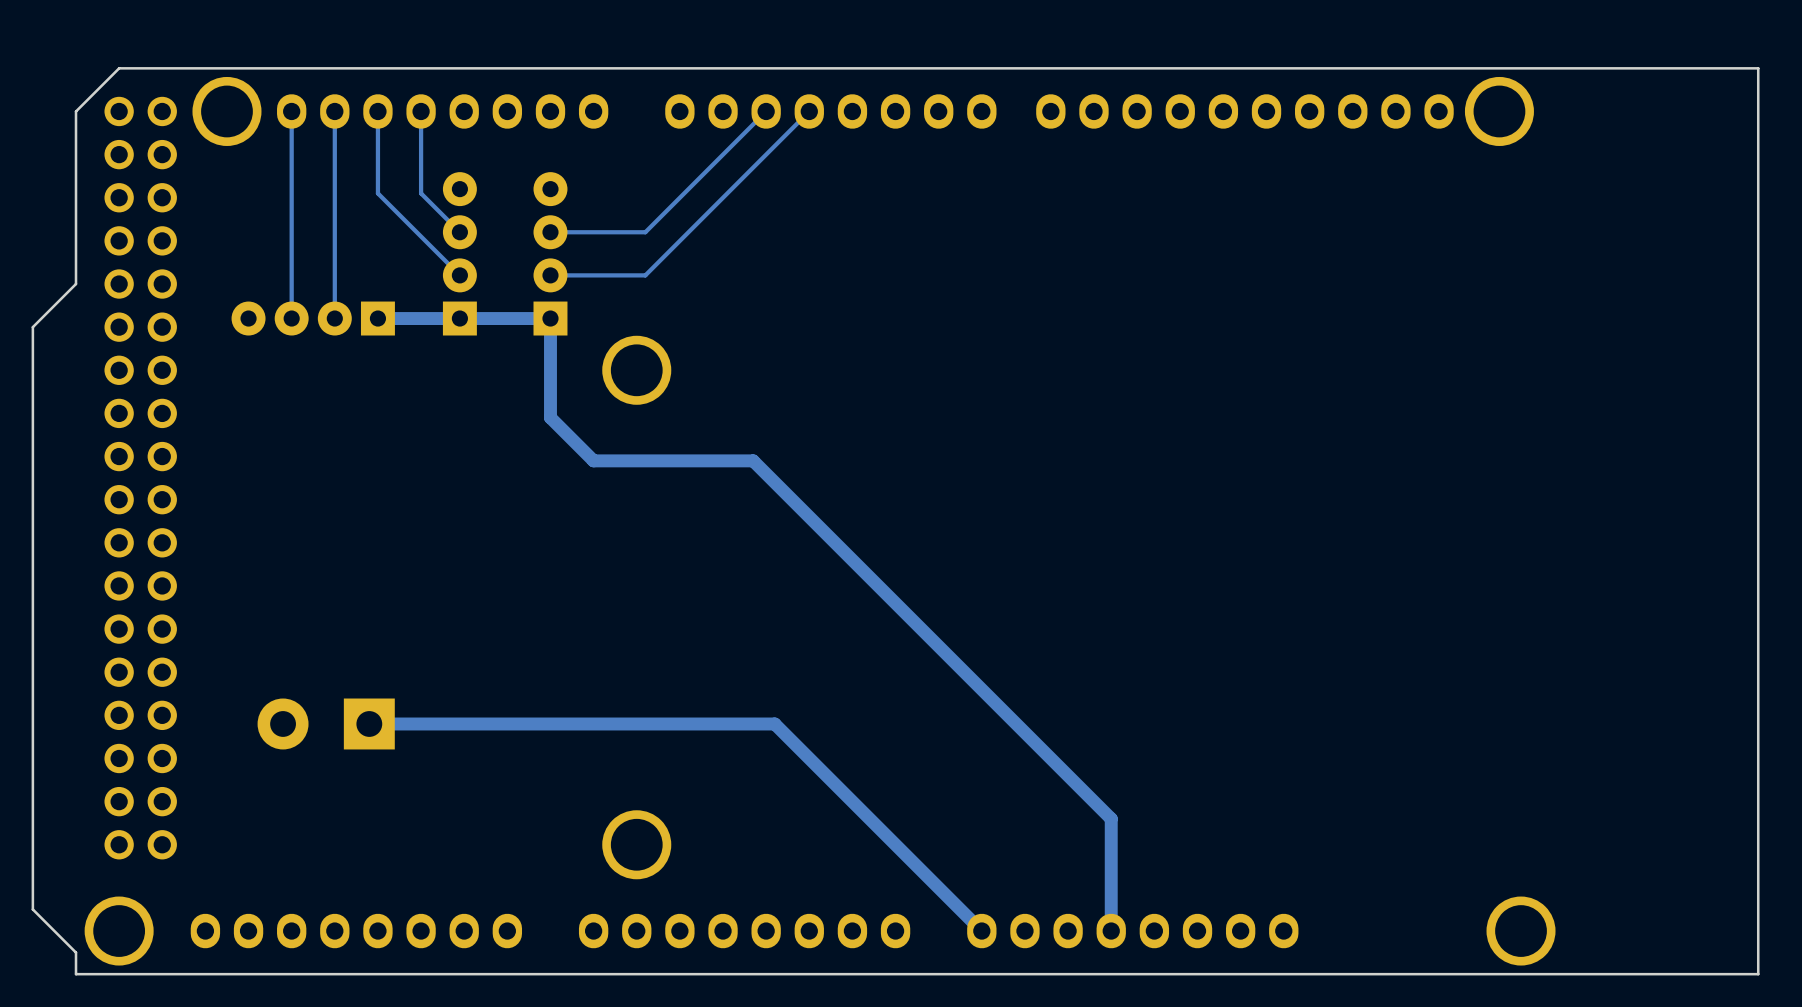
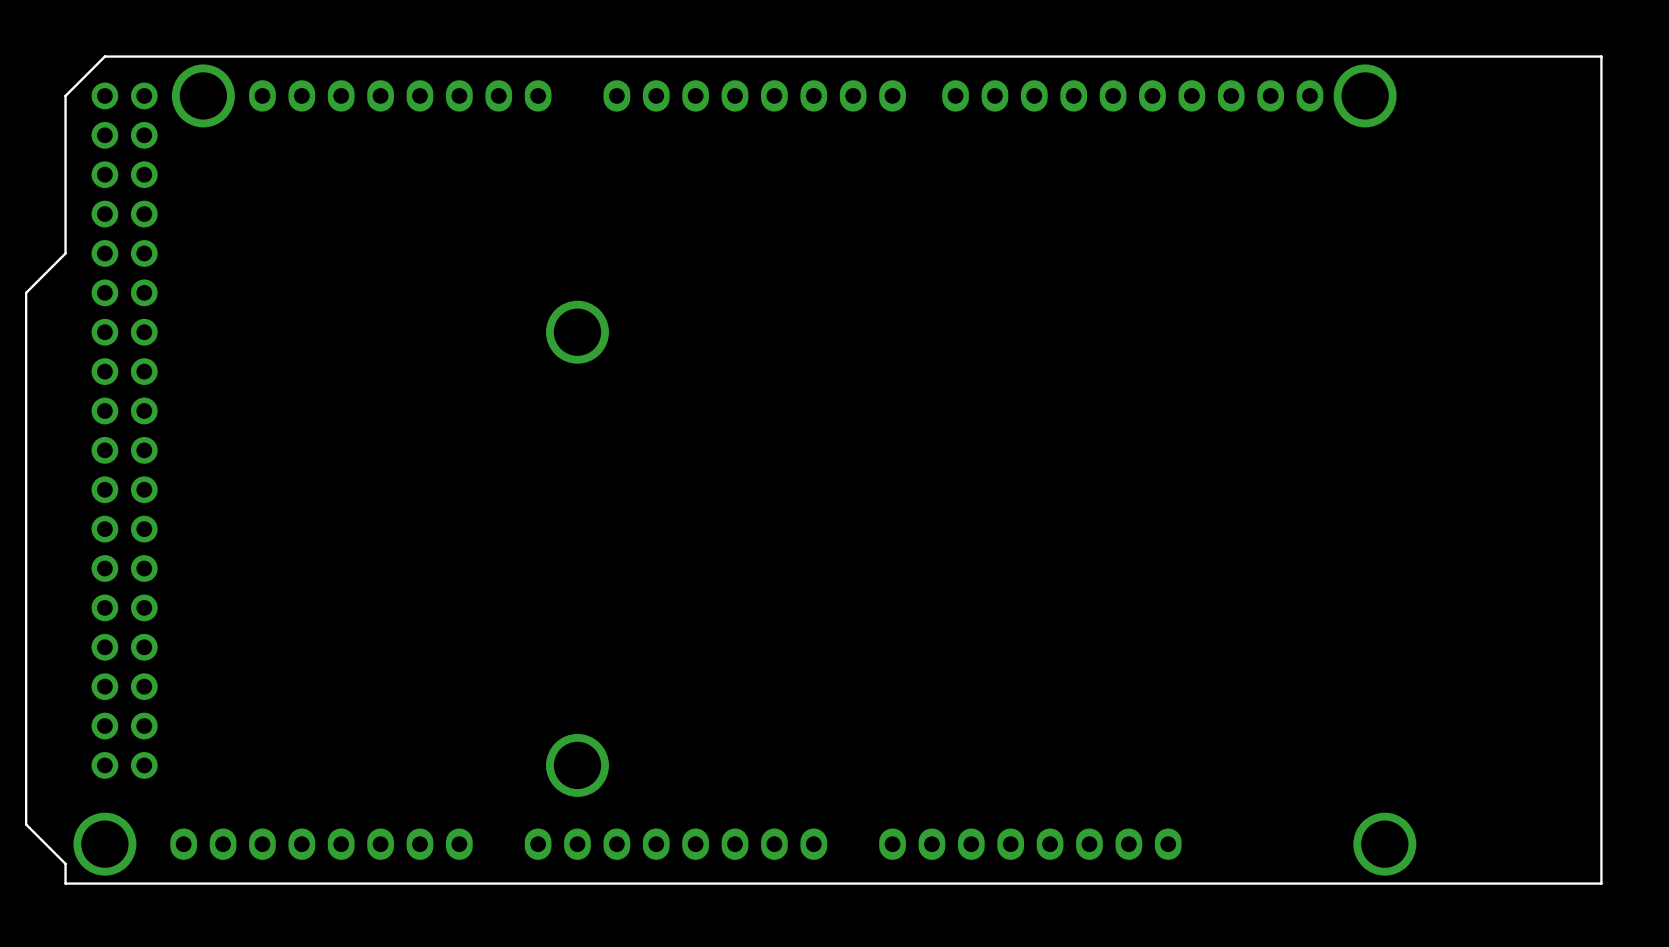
track: (291, 111) (291, 318) -> none
track: (334, 111) (334, 318) -> none
track: (377, 111) (377, 193) (459, 275) -> none
track: (421, 111) (421, 193) (459, 232) -> none
track: (766, 111) (645, 232) (550, 232) -> none
track: (809, 111) (645, 275) (550, 275) -> none
part: (459, 253) -> none
part: (550, 253) -> none
part: (313, 318) -> none
track: (377, 318) (550, 318) (550, 417) (593, 460) (753, 460) (1111, 818) (1111, 931) -> none
part: (326, 723) -> none
track: (369, 723) (774, 723) (981, 931) -> none

